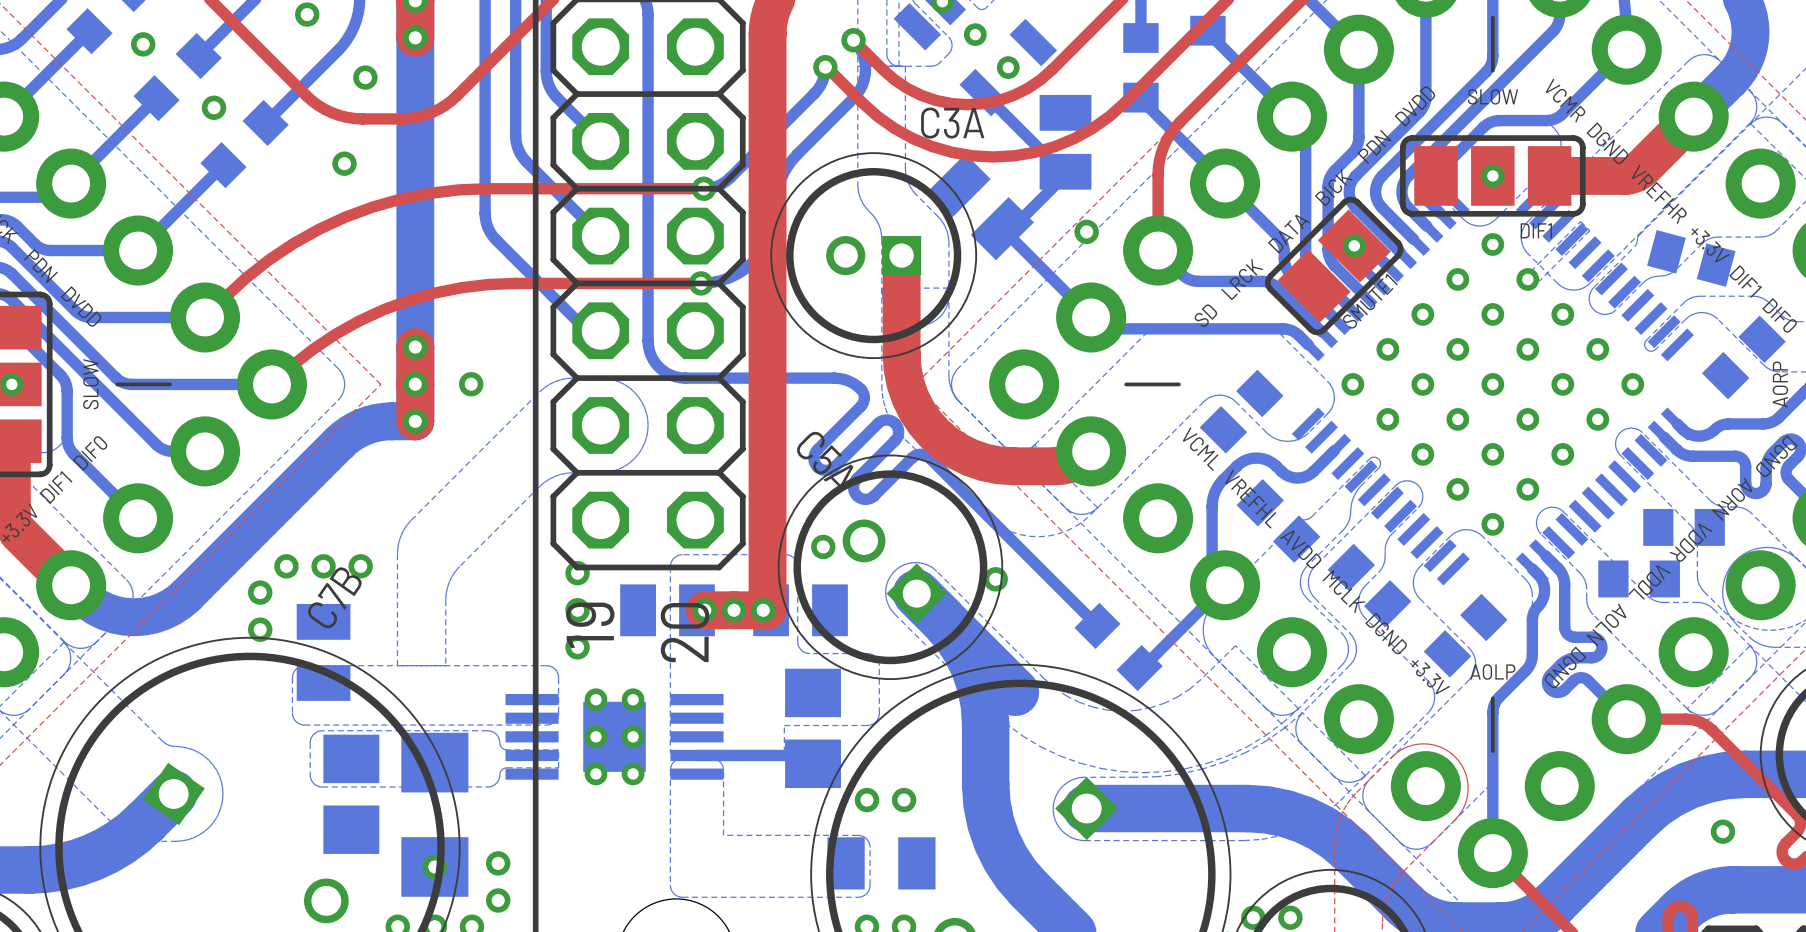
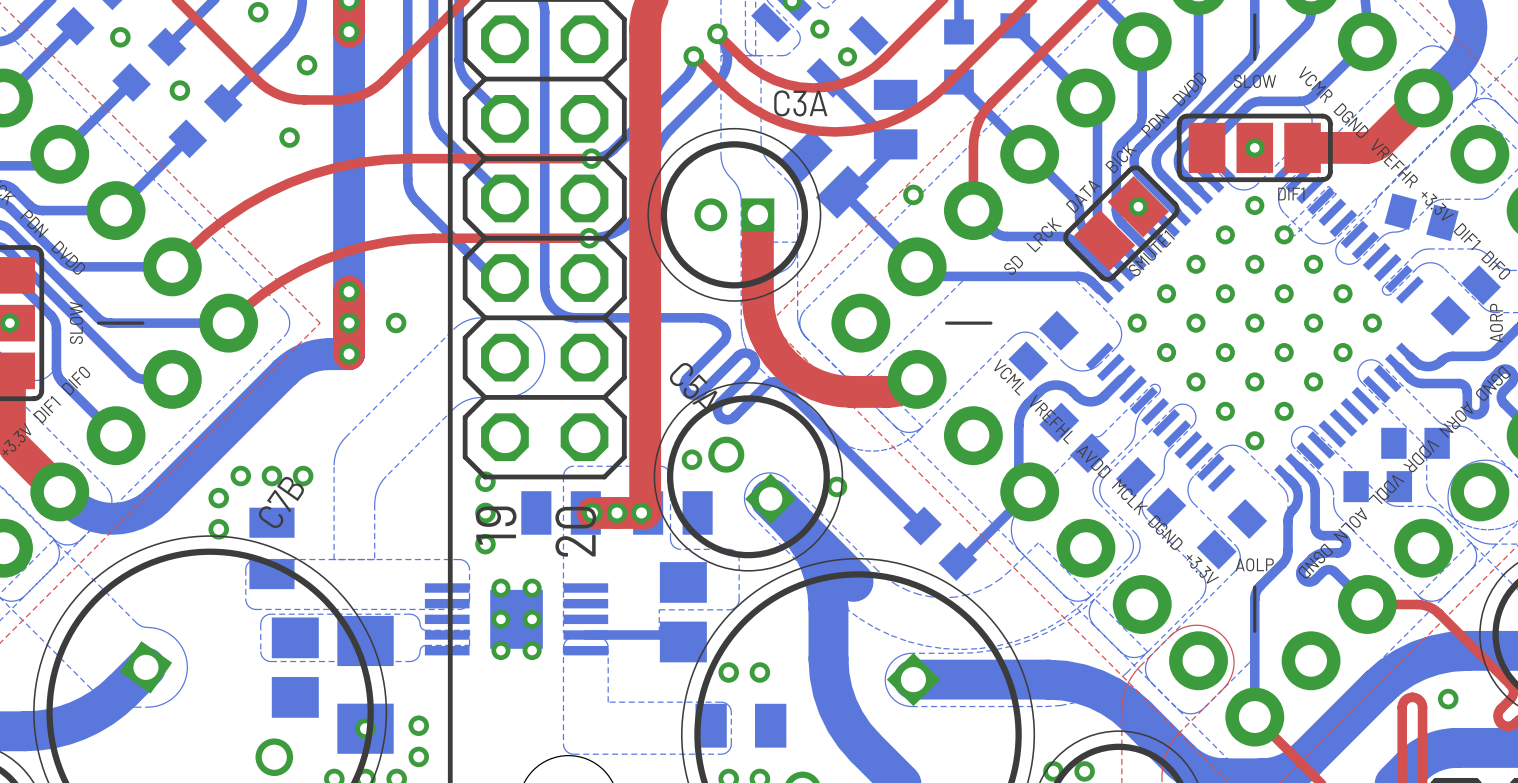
top track: (1668, 918) (1671, 909) (1680, 906) (1688, 909) (1692, 918) -> (1402, 771) (1402, 706) (1405, 700) (1412, 697) (1419, 700) (1422, 706) (1422, 771)

